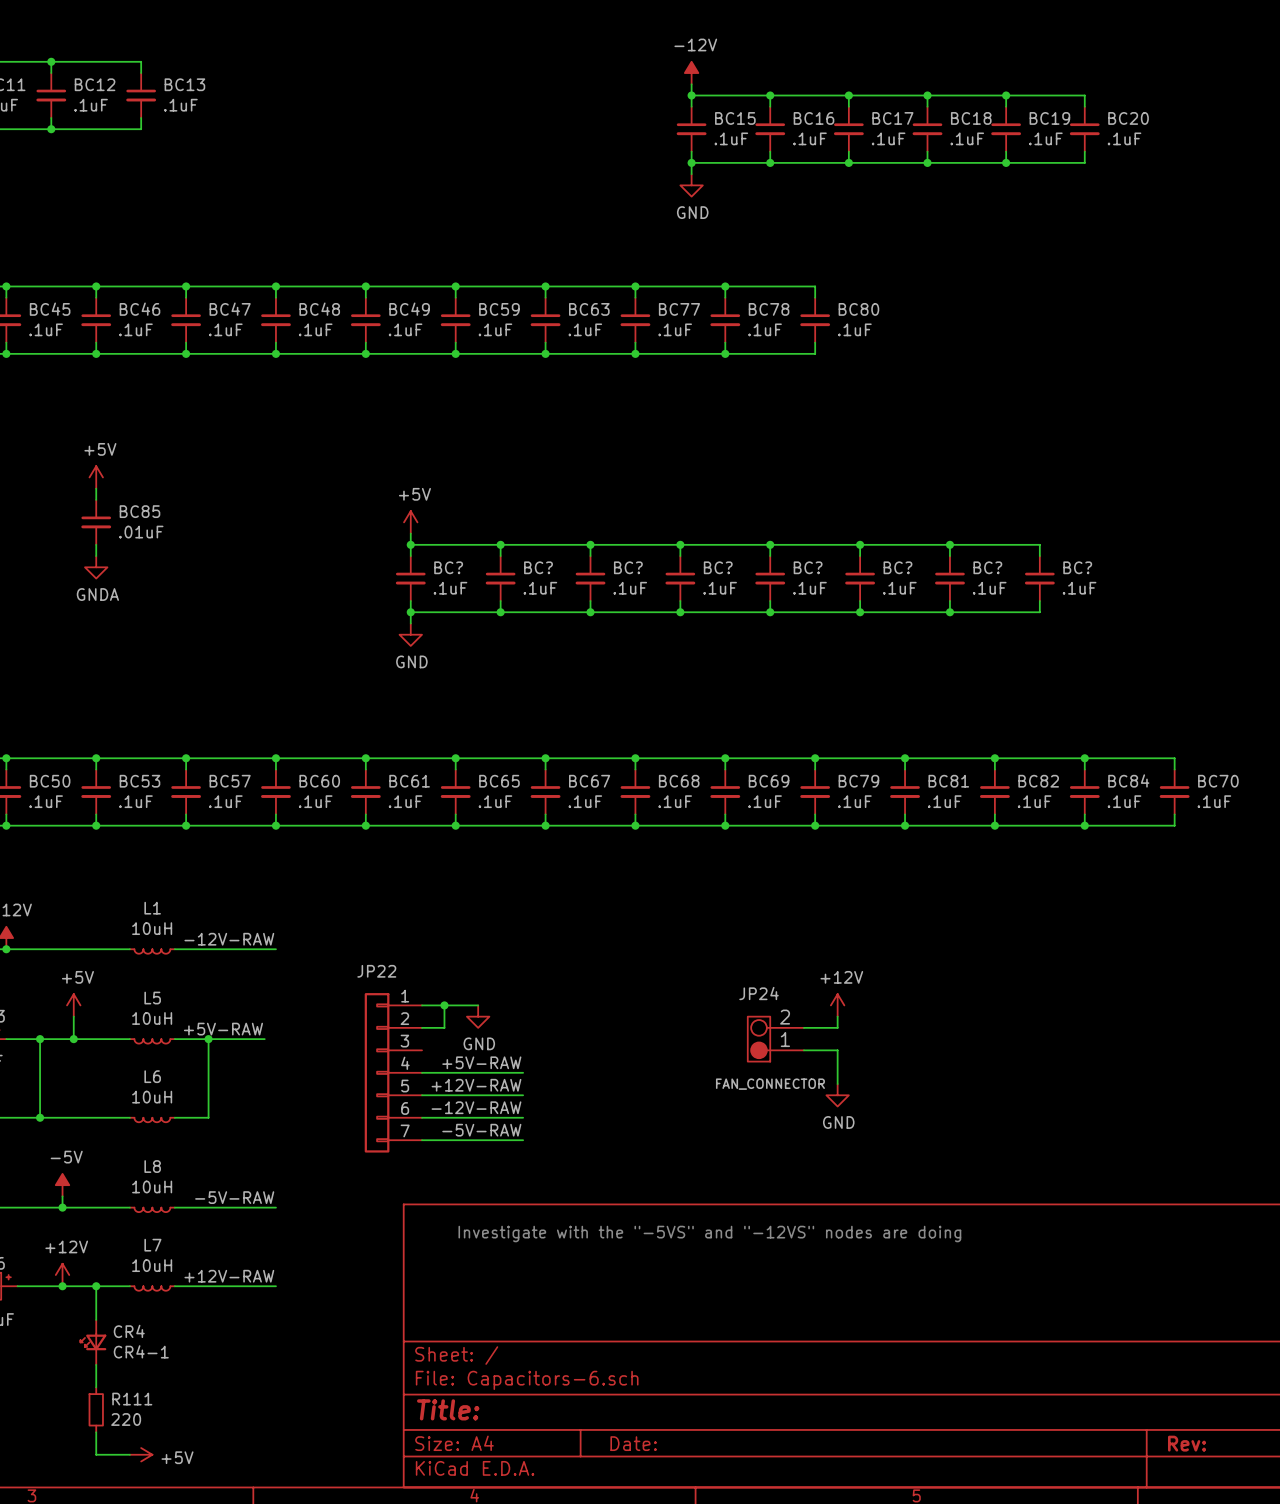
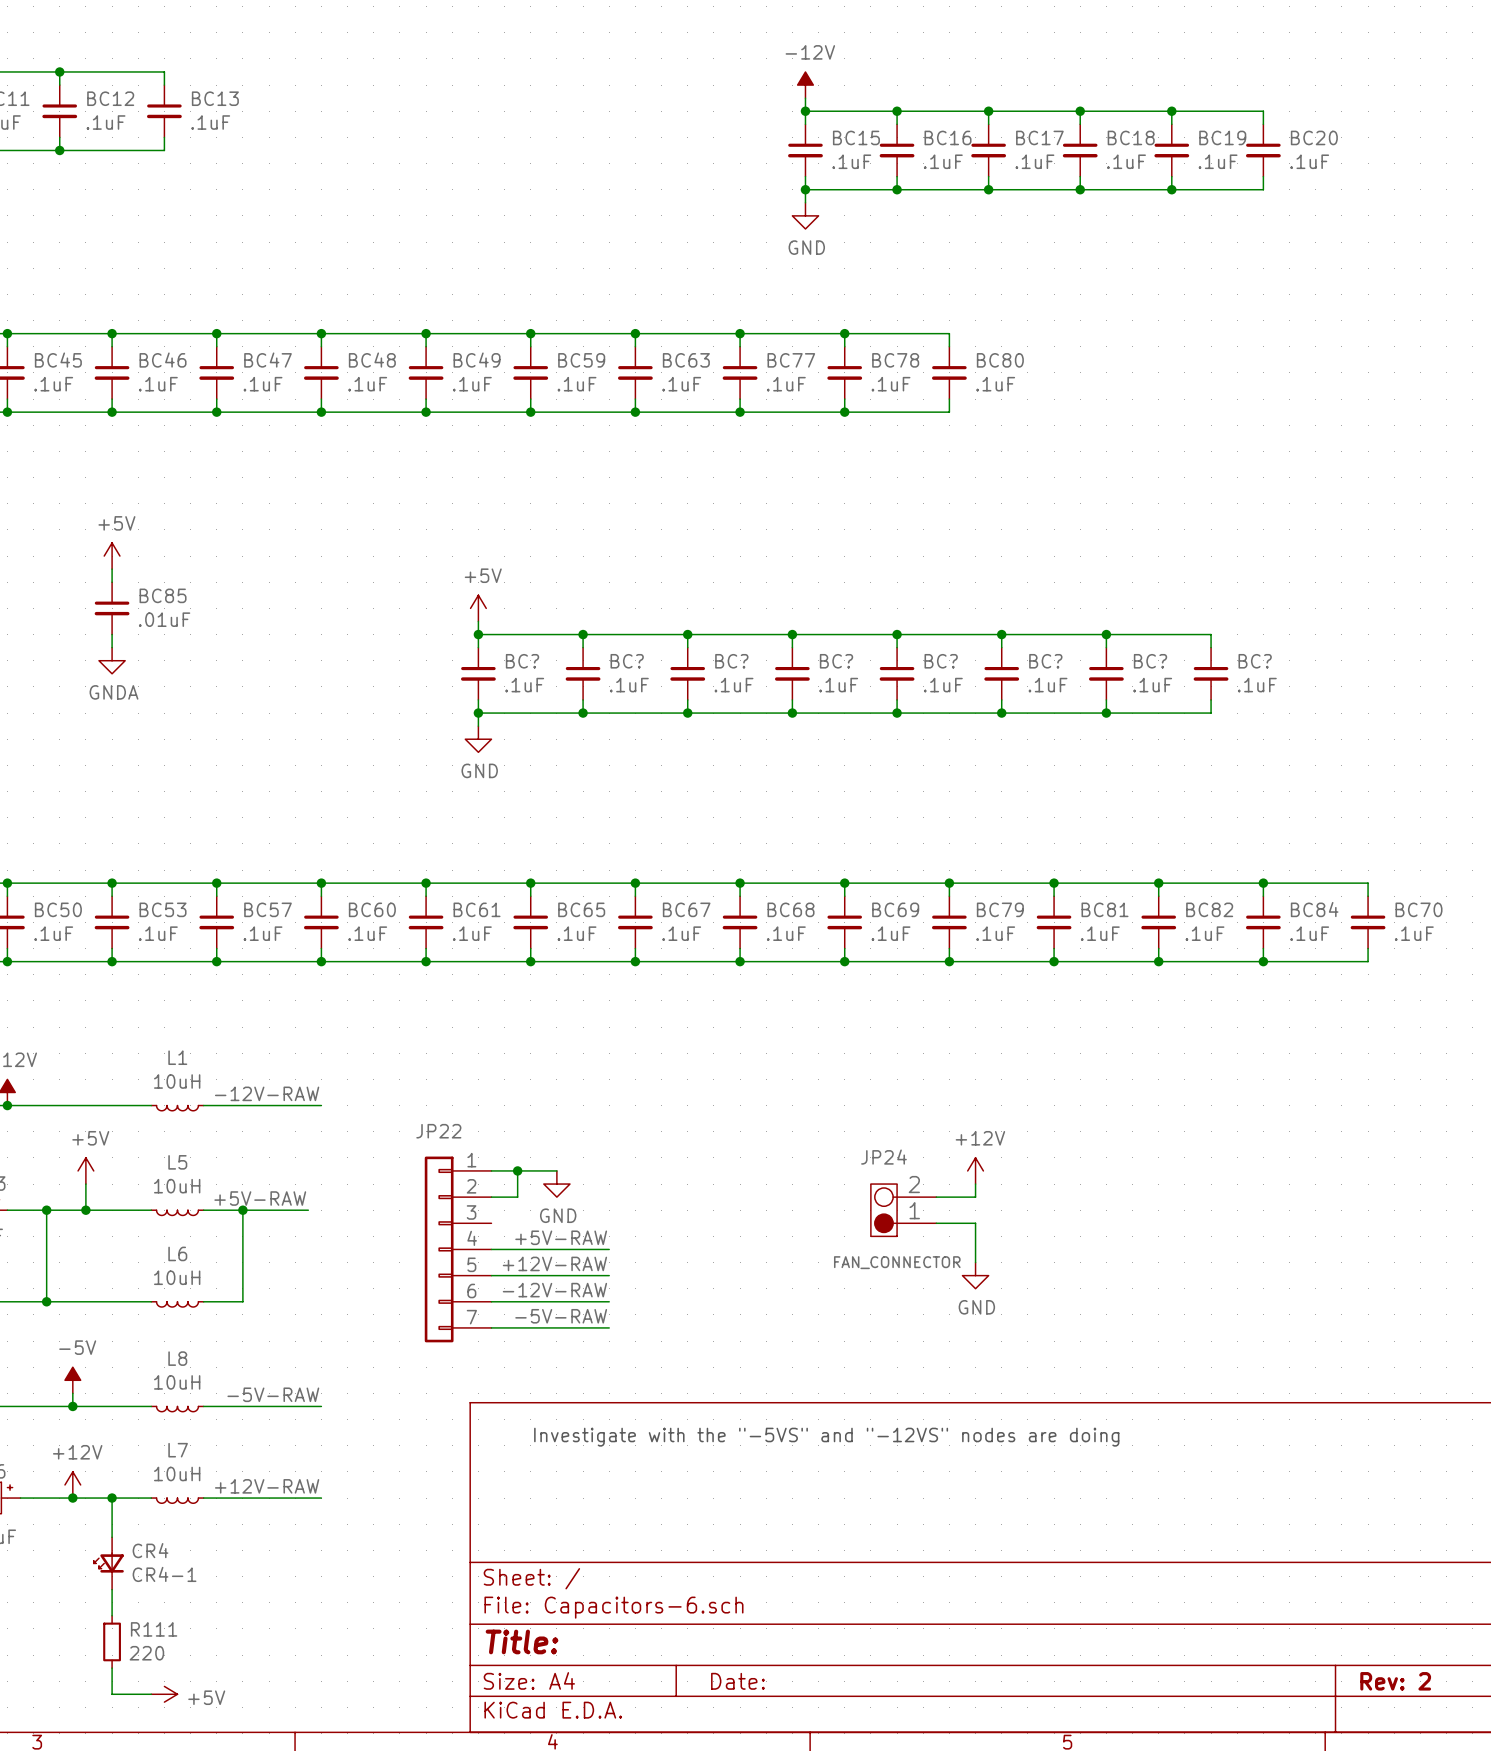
title block: Rev: (1186, 1443) -> Rev: 2 (1395, 1681)

